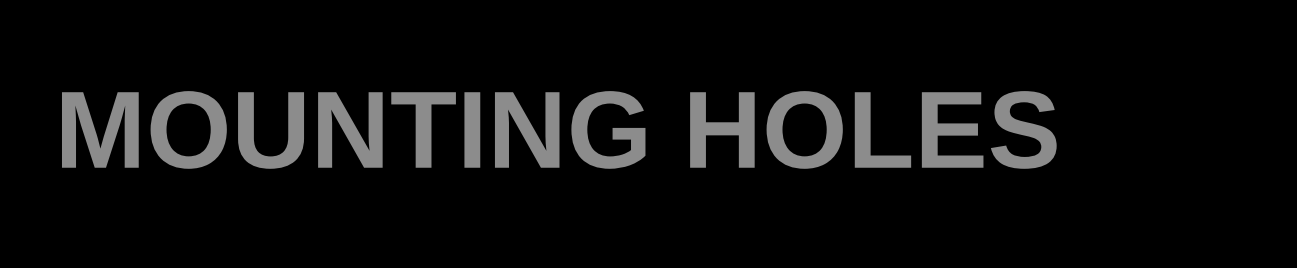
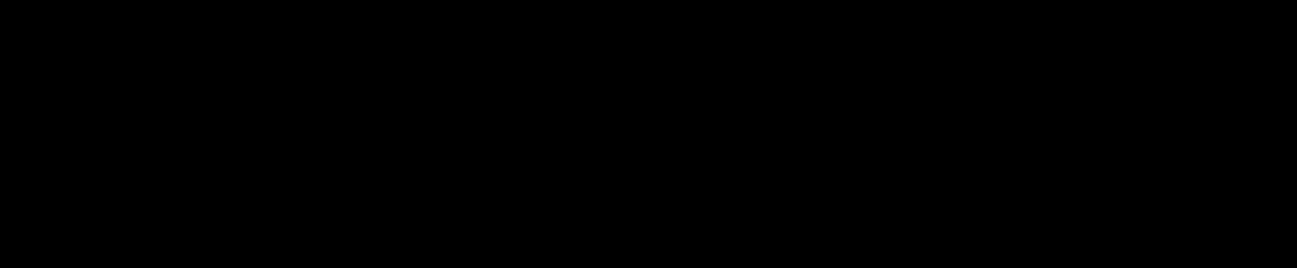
text: MOUNTING HOLES (559, 129) -> none

